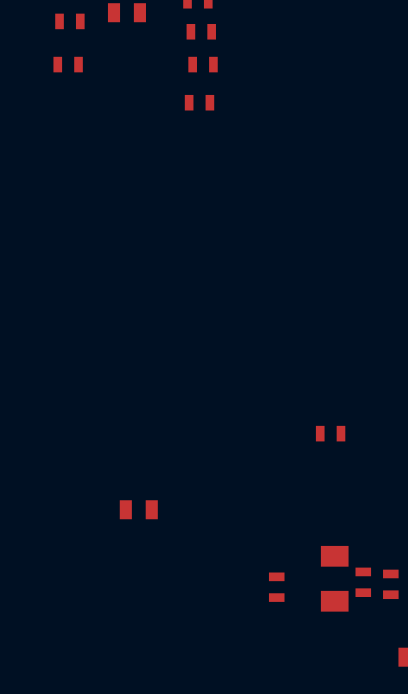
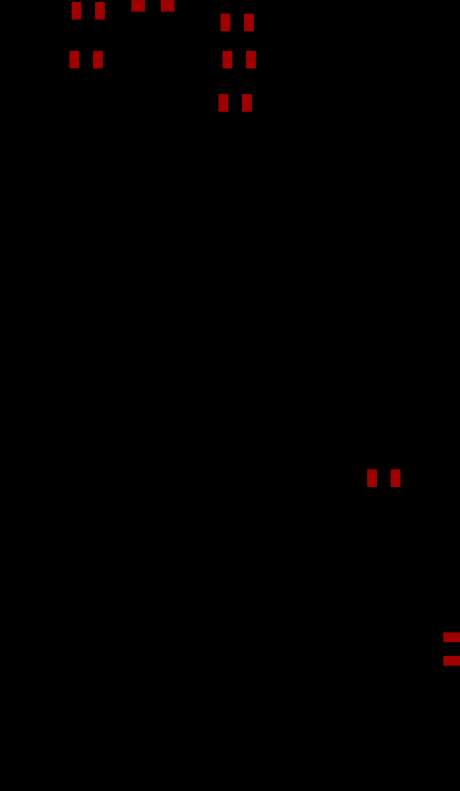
part: (138, 509) -> none
part: (334, 578) -> none
part: (363, 582) -> none
part: (276, 587) -> none

